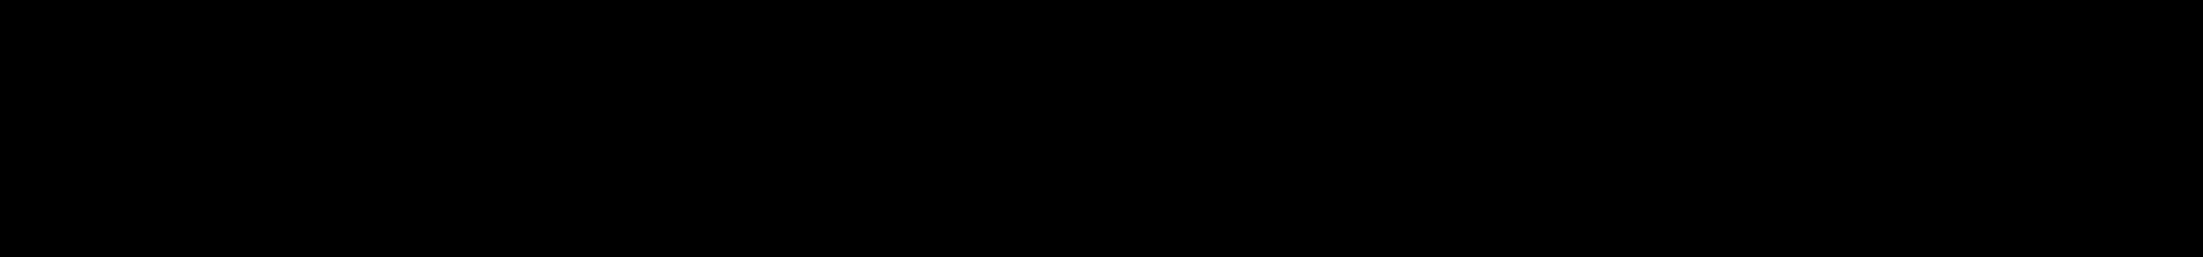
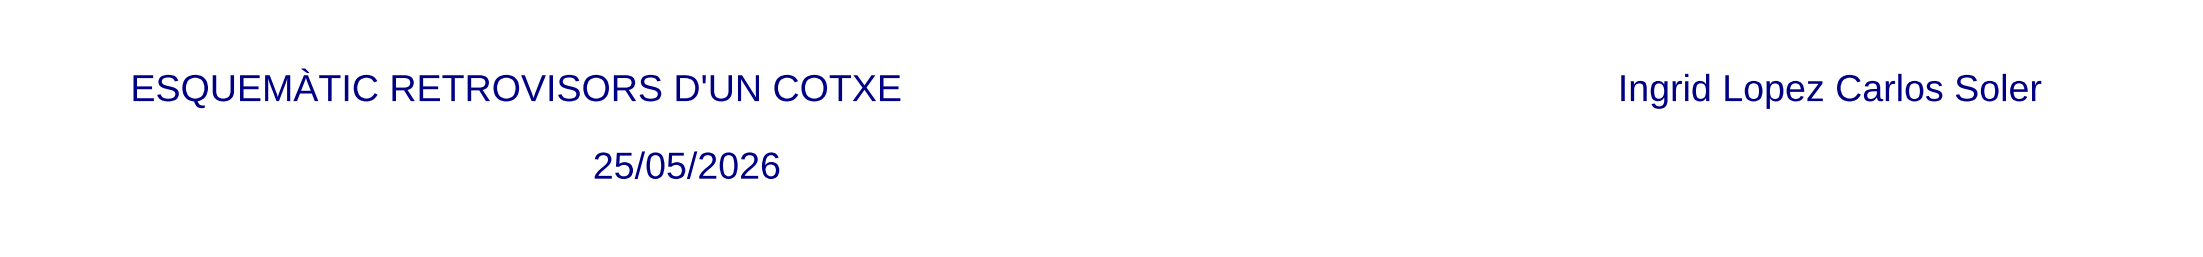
text: none -> ESQUEMÀTIC RETROVISORS D'UN COTXE (516, 88)
text: none -> Ingrid Lopez Carlos Soler (1831, 91)
text: none -> 25/05/2026 (686, 165)

